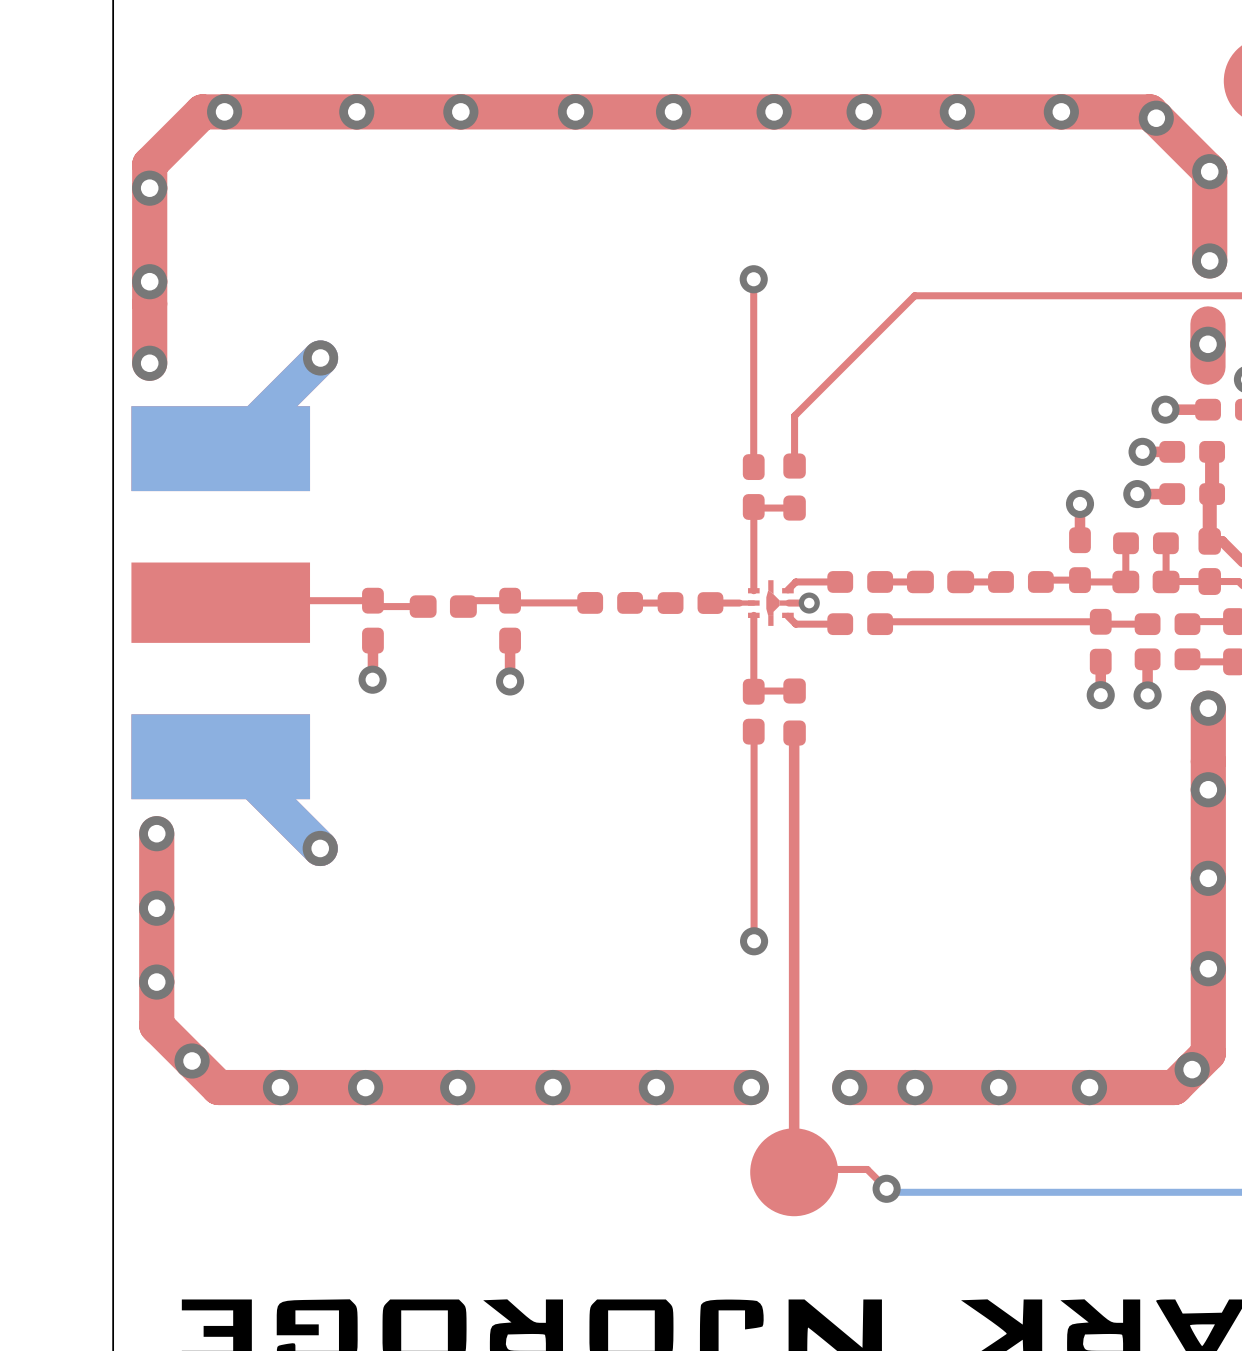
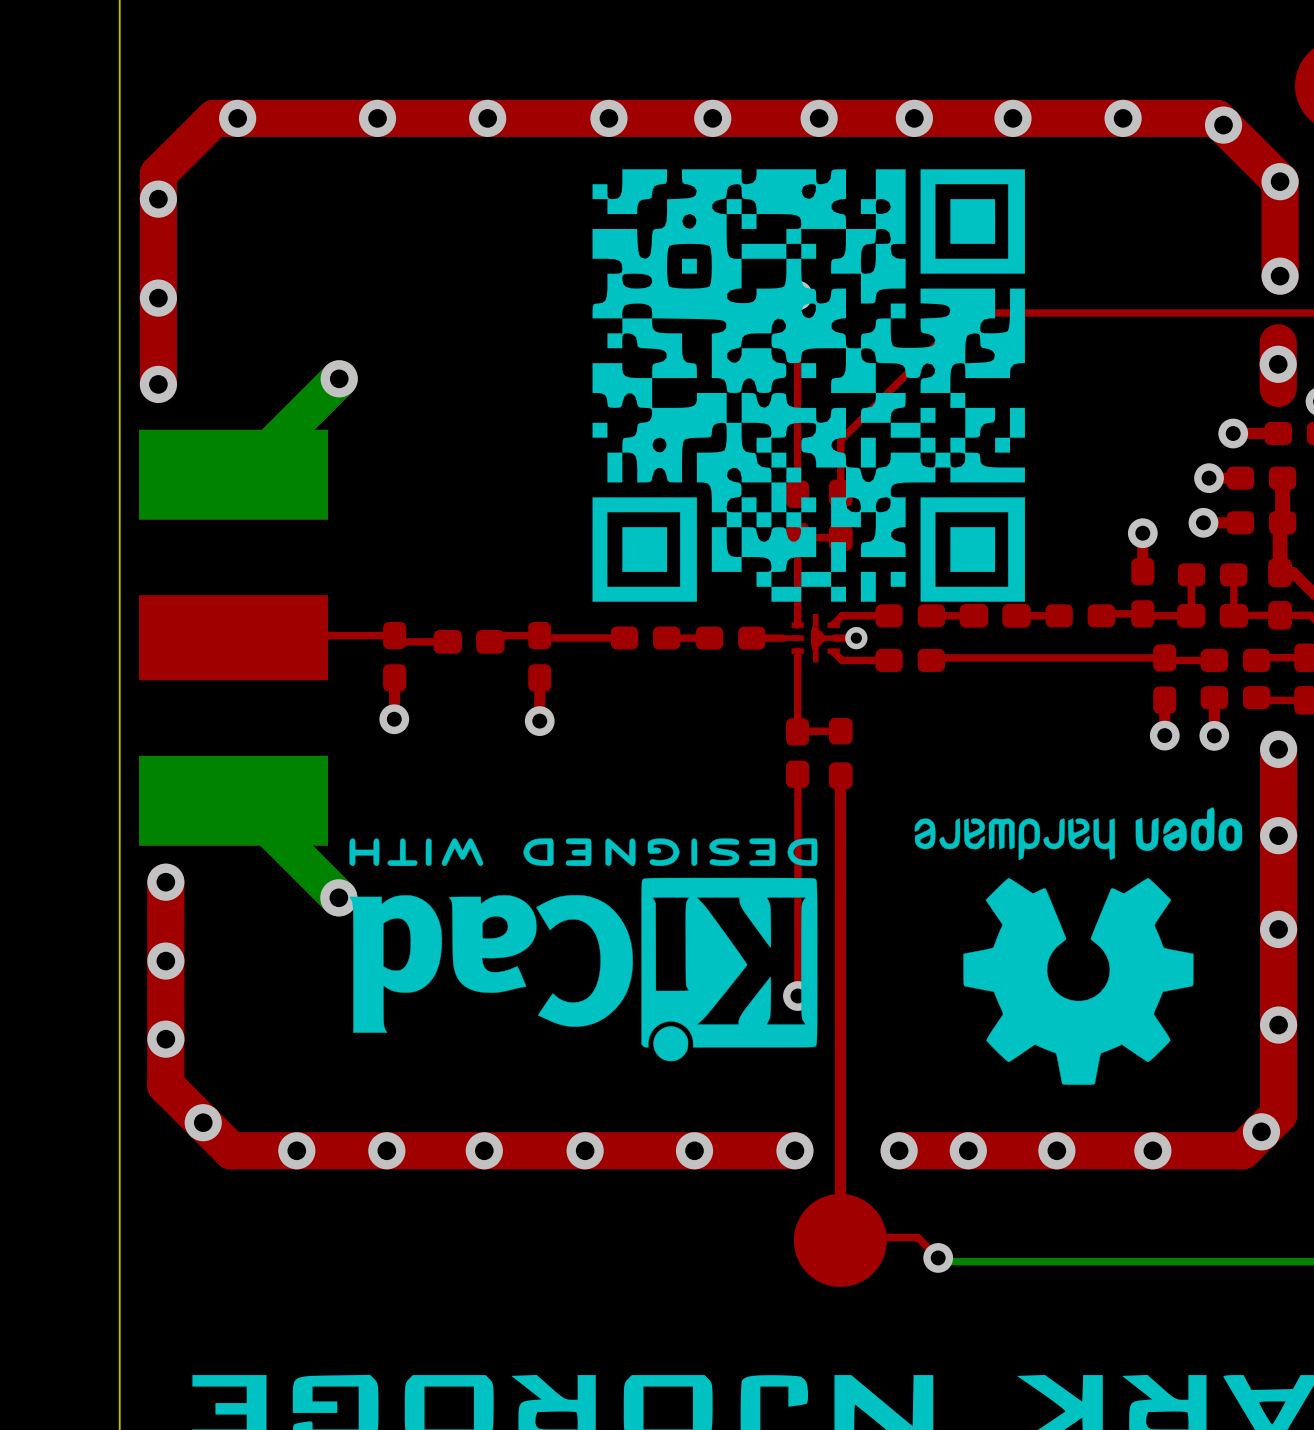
drawing: none -> [592, 169, 1025, 602]
drawing: none -> [914, 807, 1243, 1085]
drawing: none -> [349, 838, 818, 1062]

